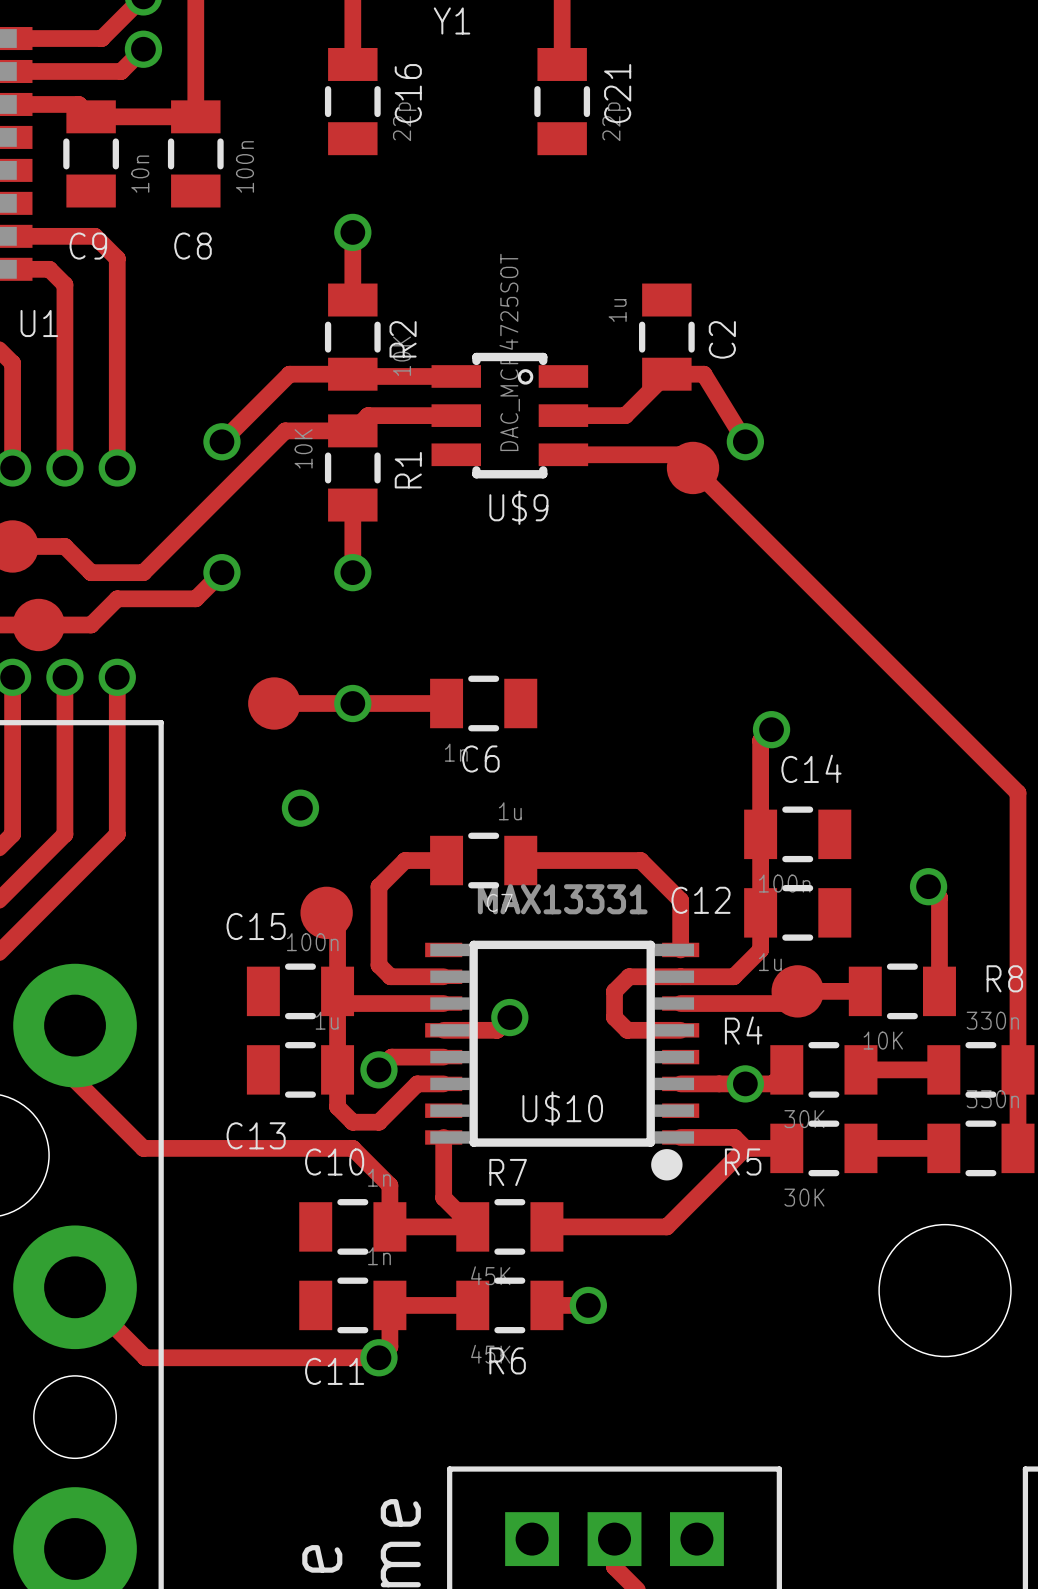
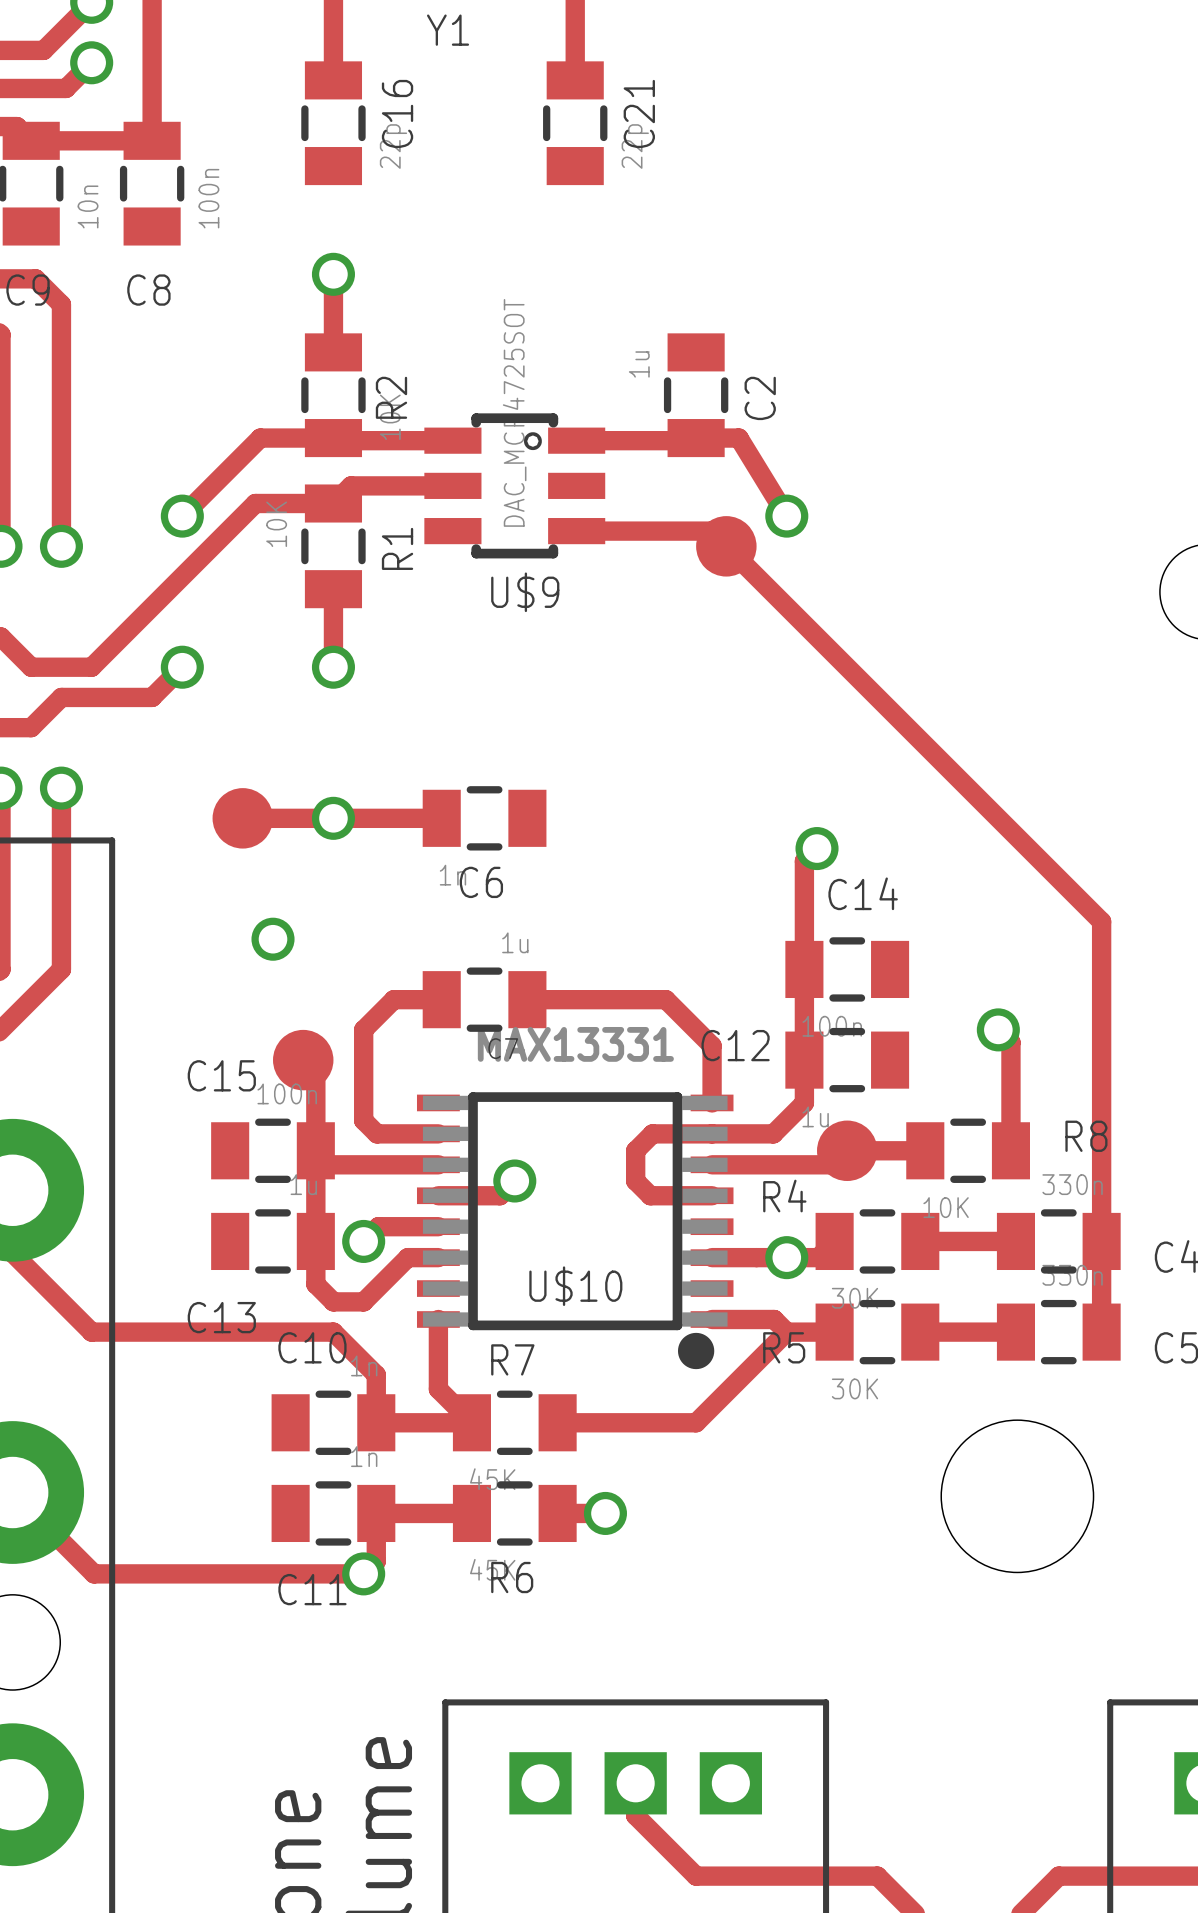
track: (664, 376) (625, 415) (563, 415) -> (693, 440) (576, 440)

